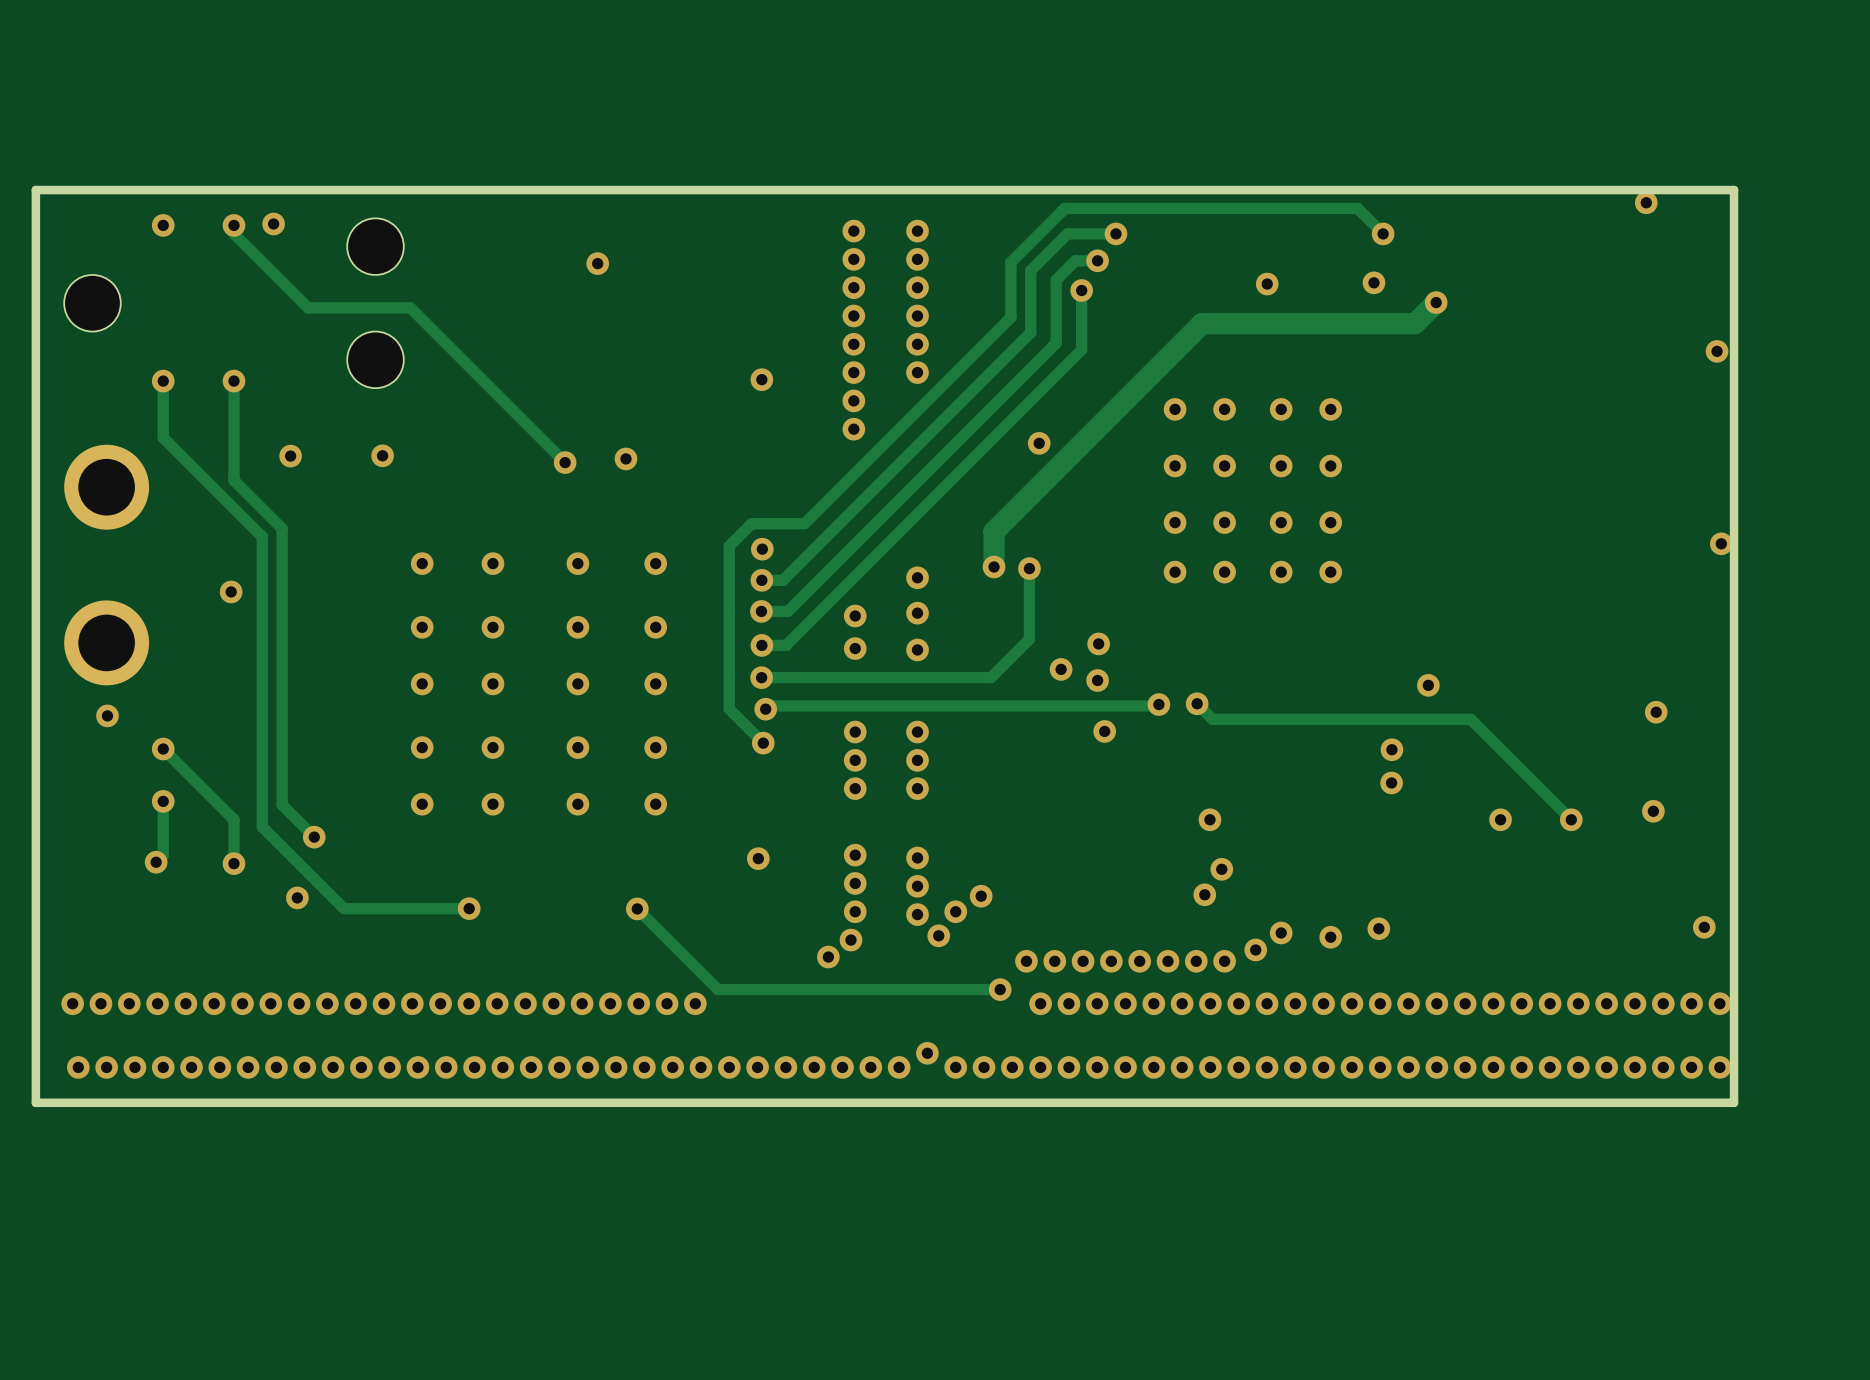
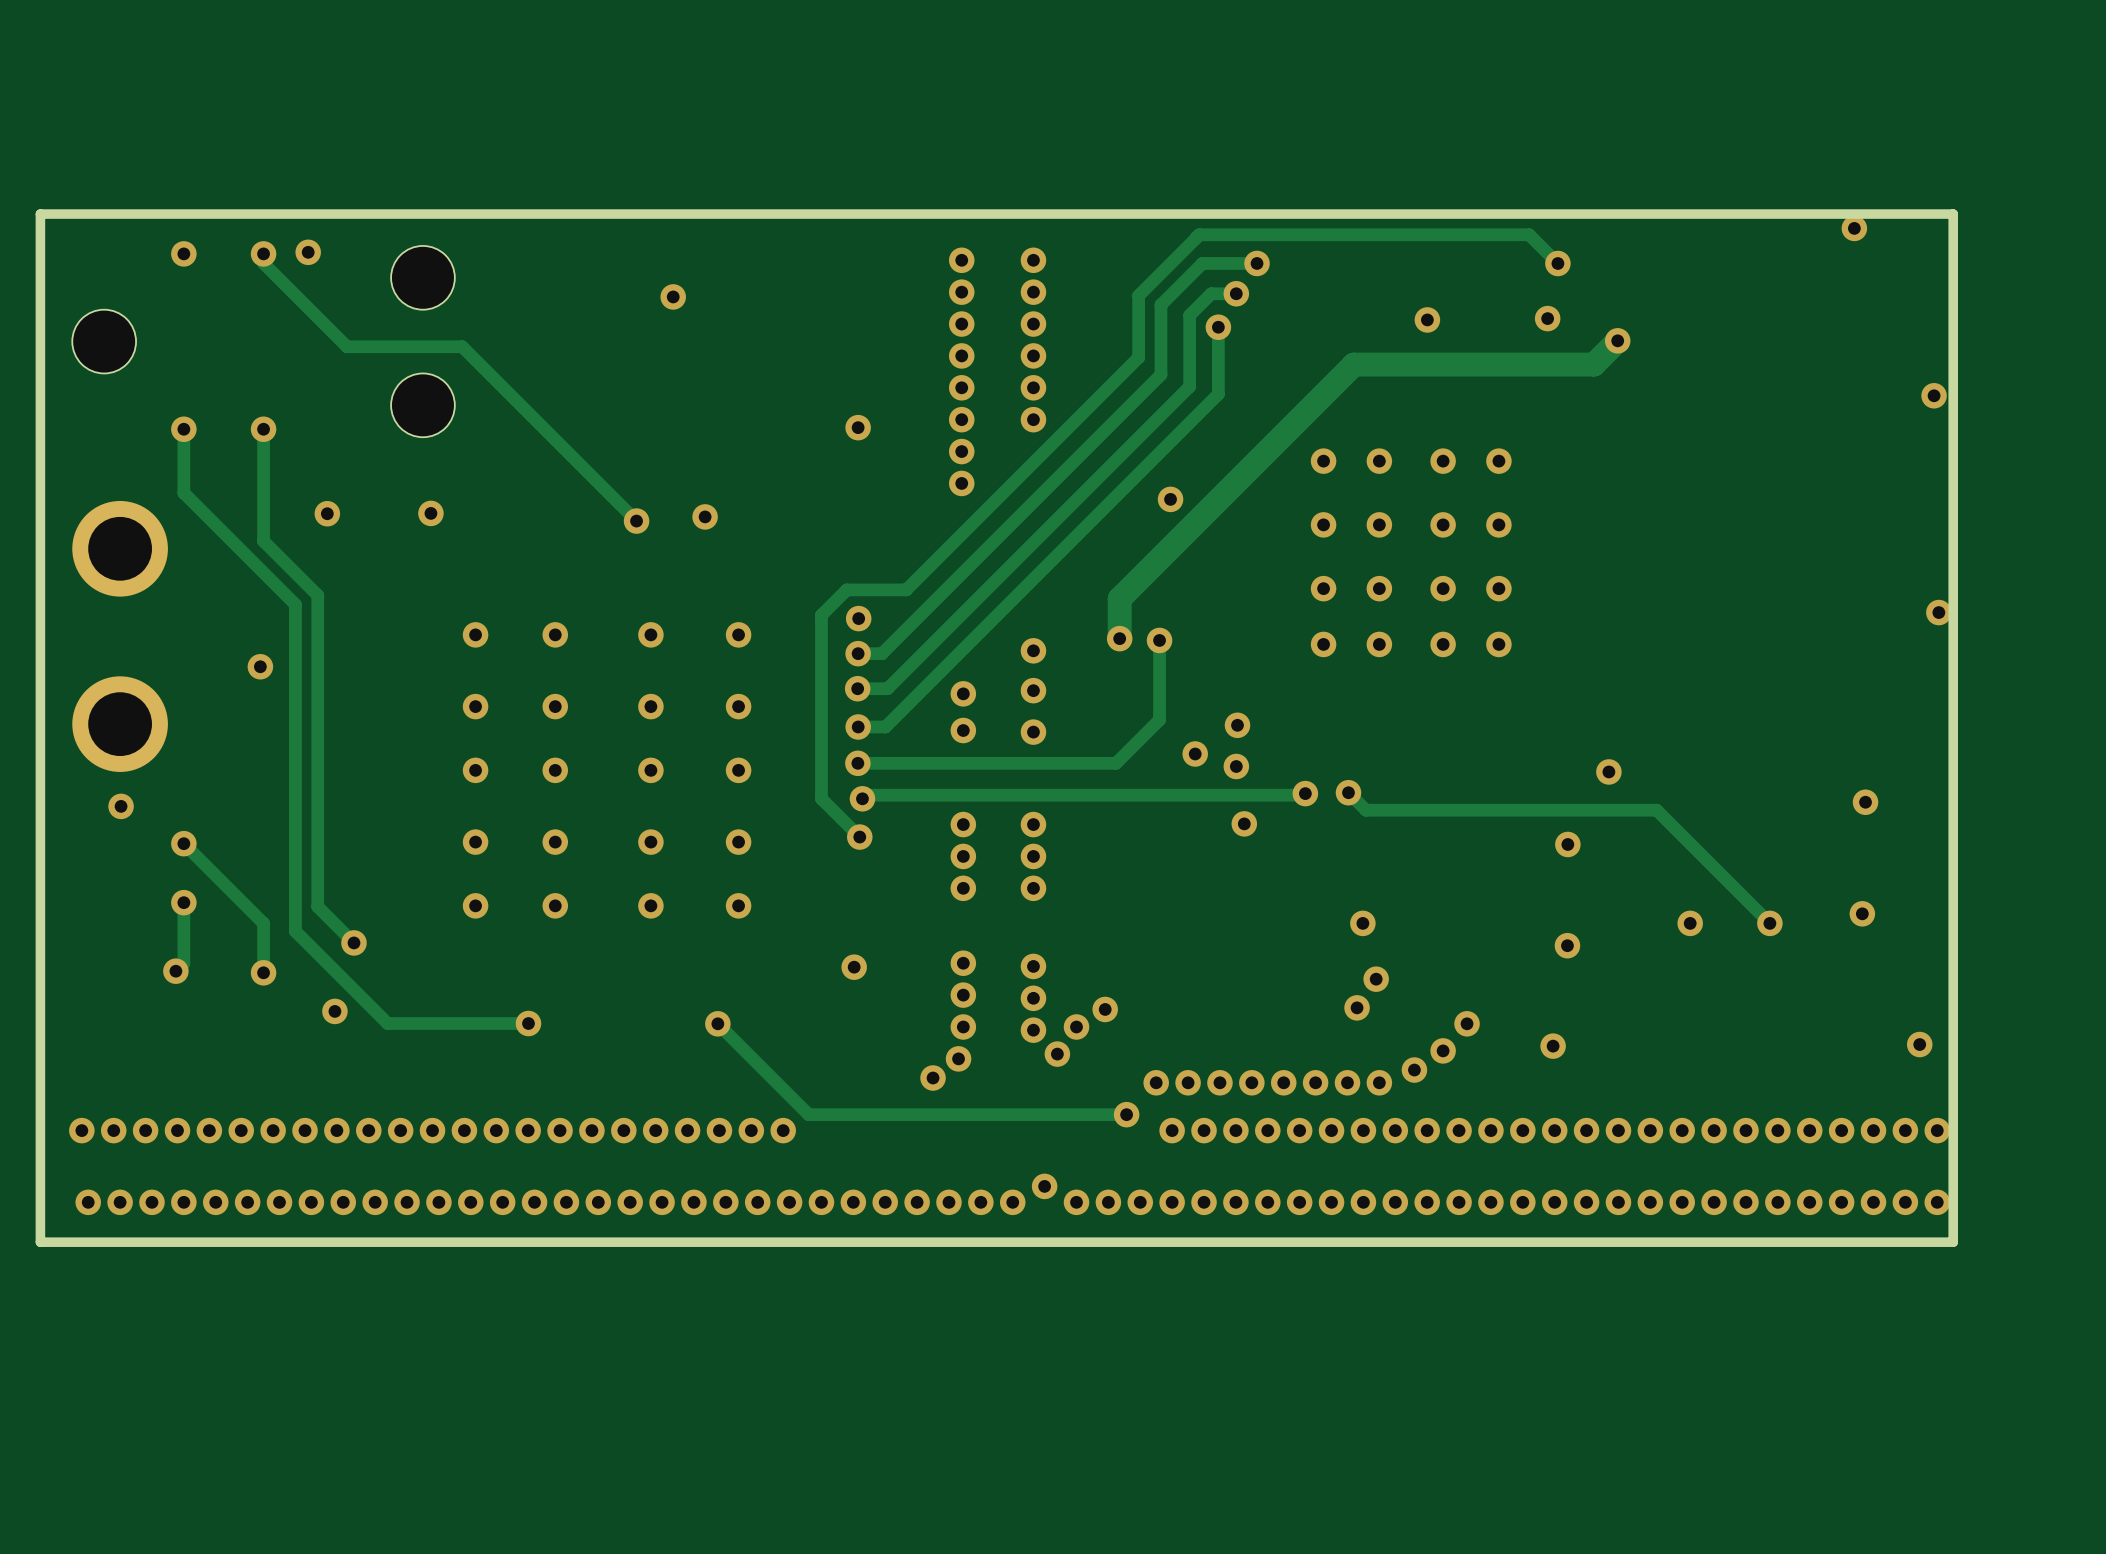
via position: (1391, 782) -> (1567, 945)
via position: (1330, 937) -> (1467, 1023)

